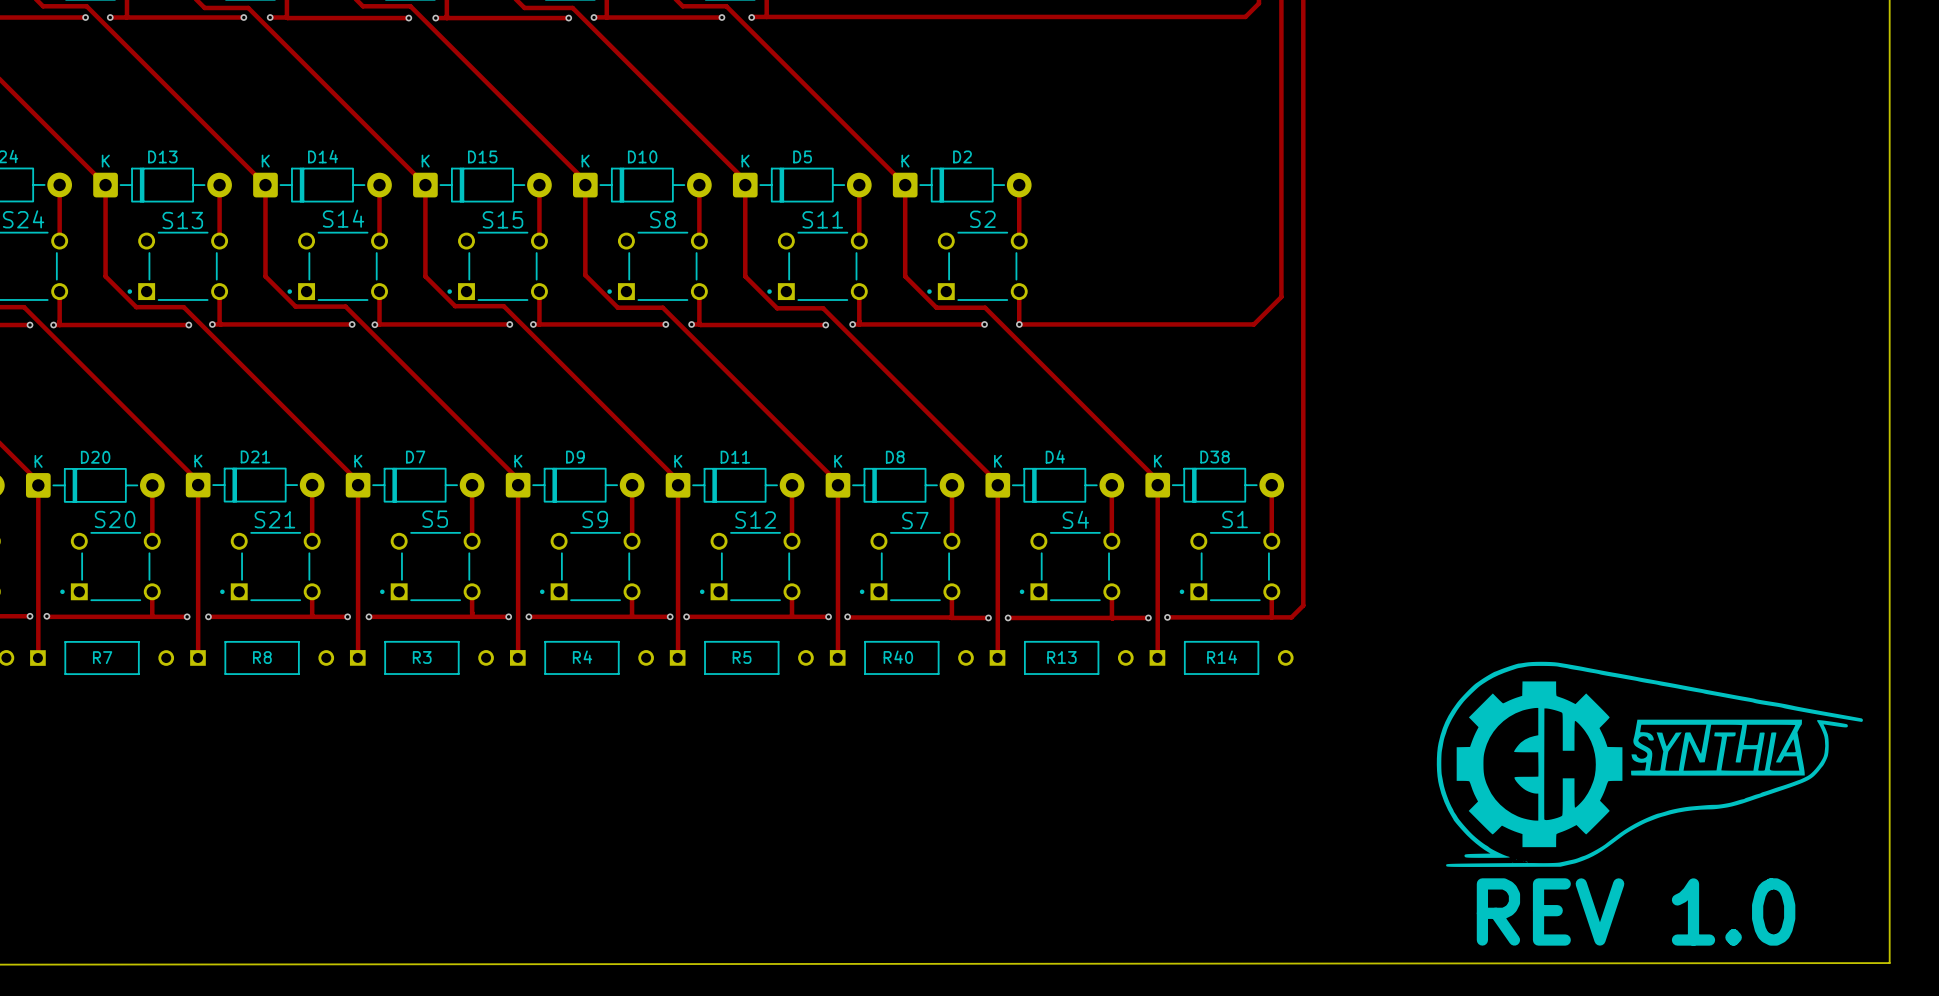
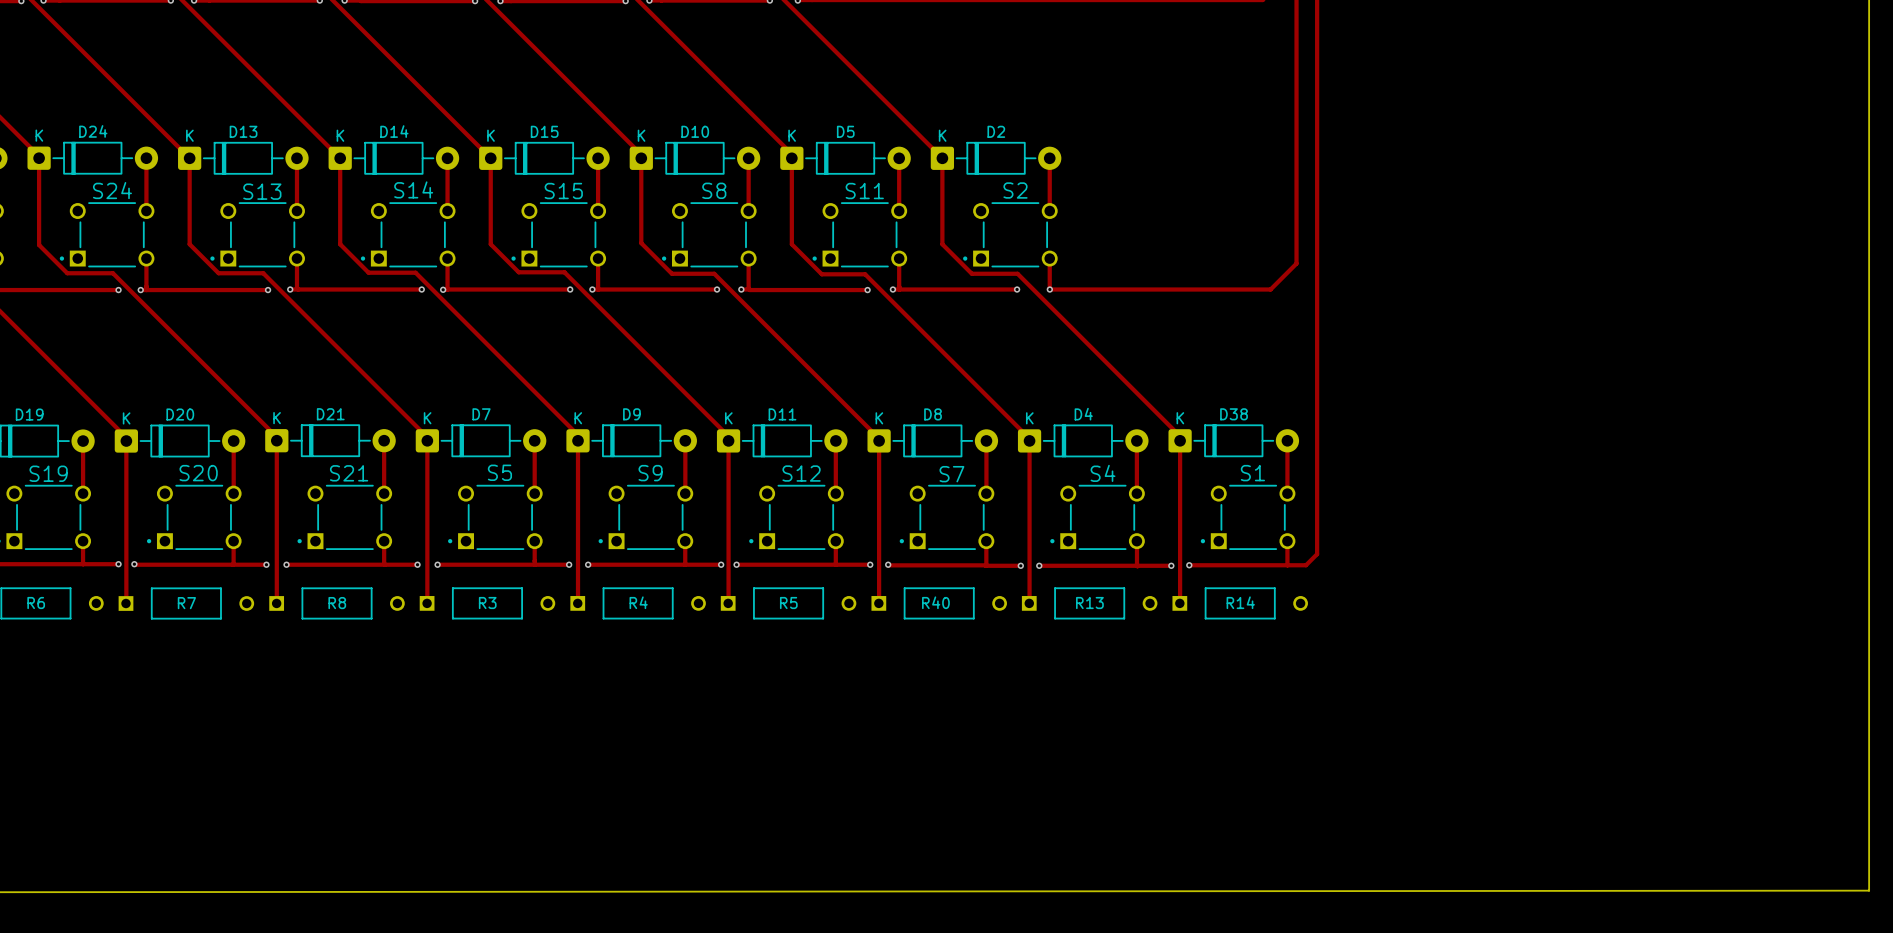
drawing: [1436, 661, 1863, 867] -> none
text: REV 1.0 (1636, 911) -> none

